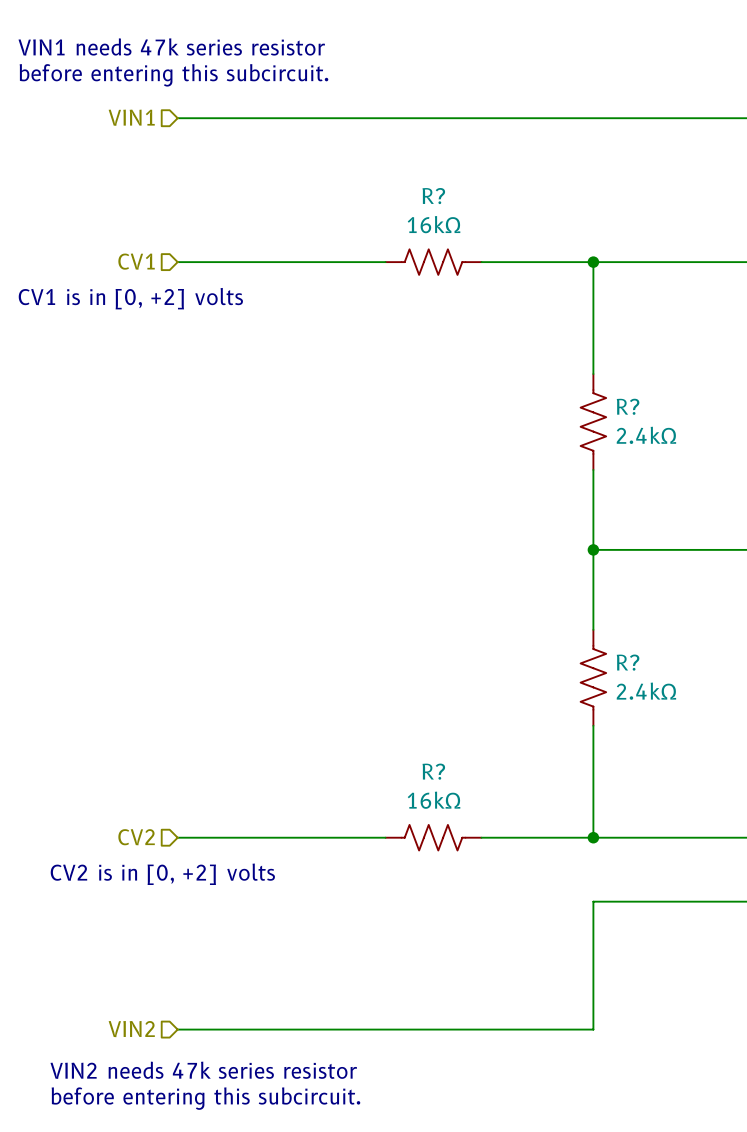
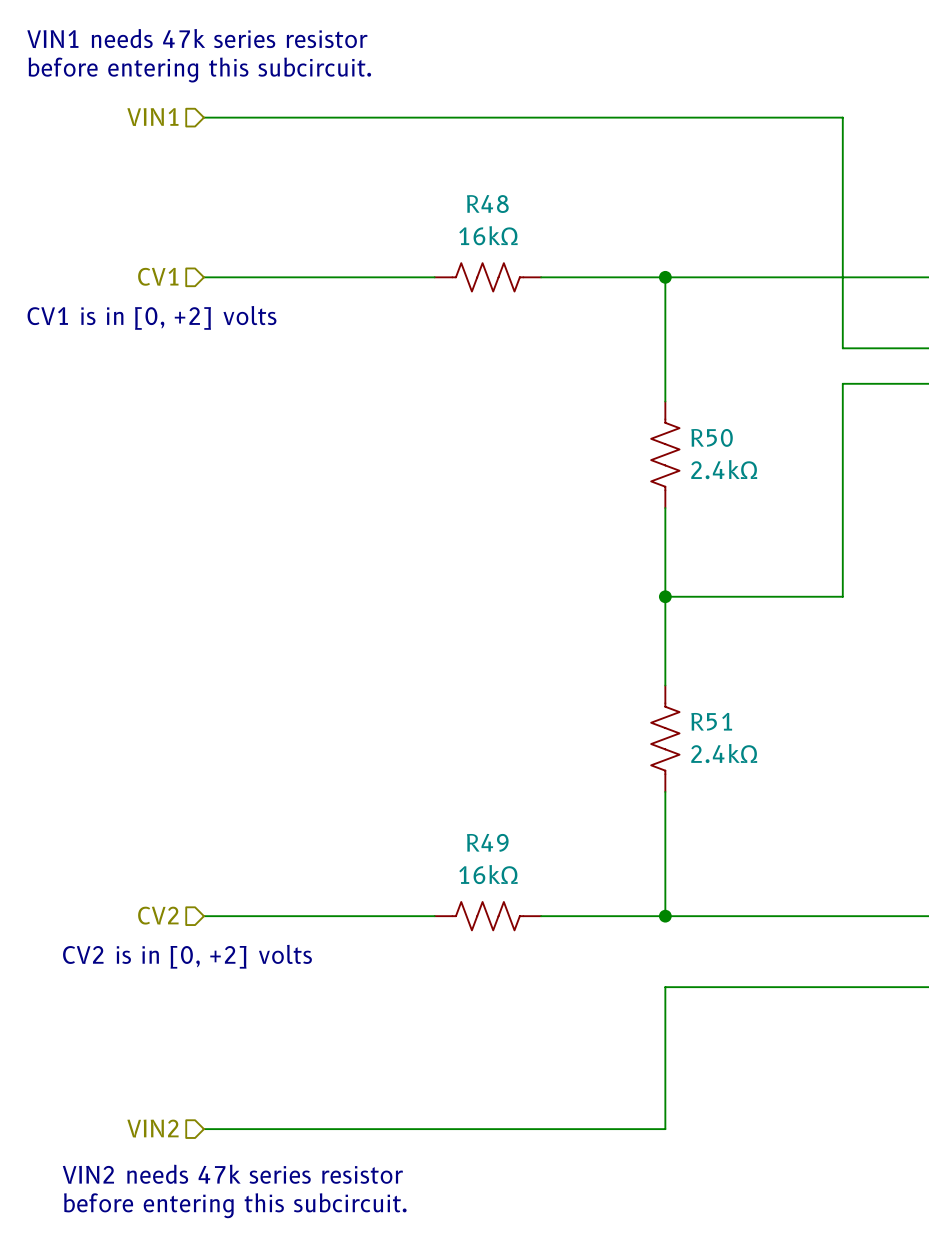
R? name: R? (433, 196) -> R48 (487, 204)
R? name: R? (628, 406) -> R50 (712, 437)
R? name: R? (628, 662) -> R51 (711, 721)
R? name: R? (433, 771) -> R49 (487, 842)

